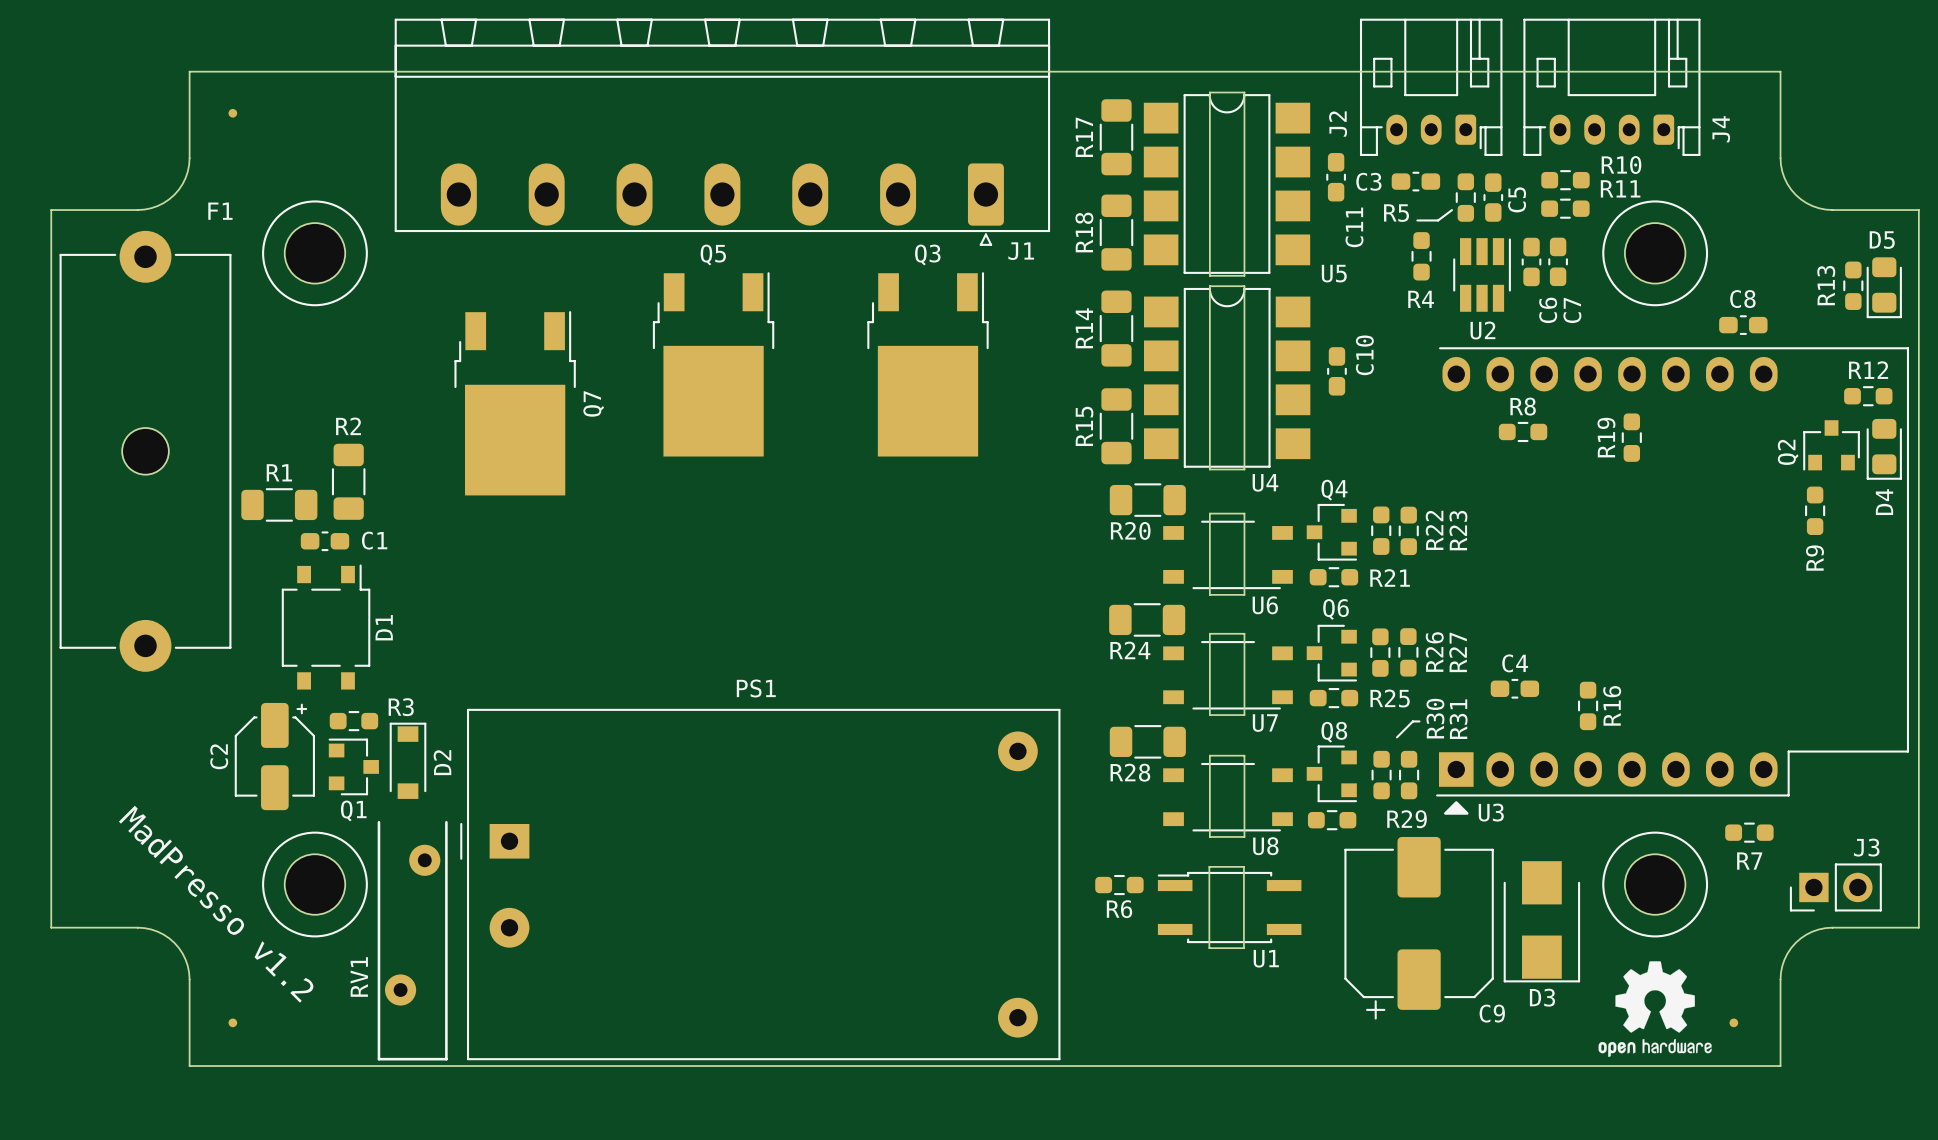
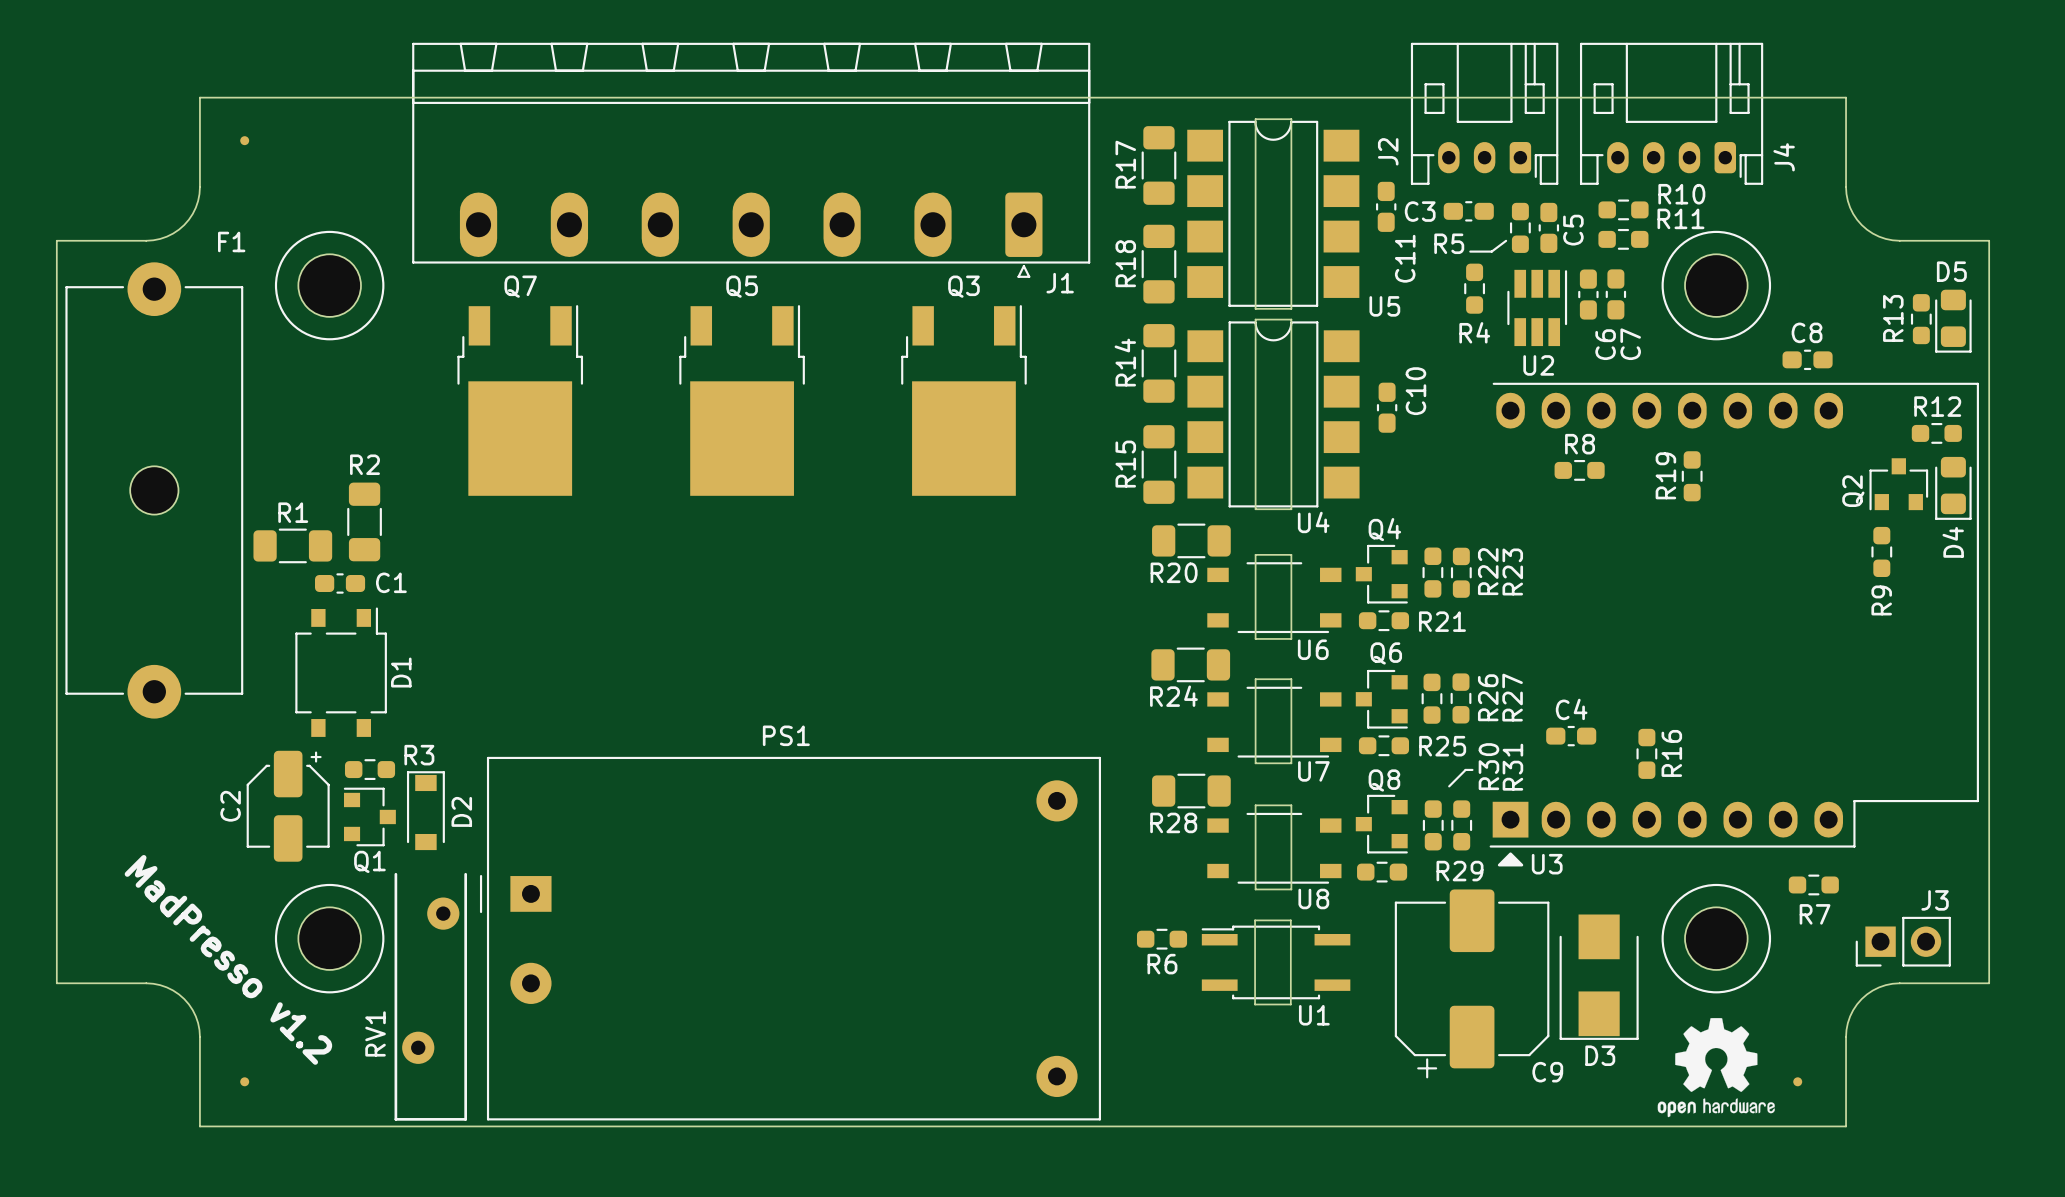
Q7 position: (515, 403) -> (520, 400)
Q7 name rotation: 0° (593, 403) -> 90° clockwise (520, 286)
Q7 name position: Q7 (593, 403) -> Q7 (520, 286)

